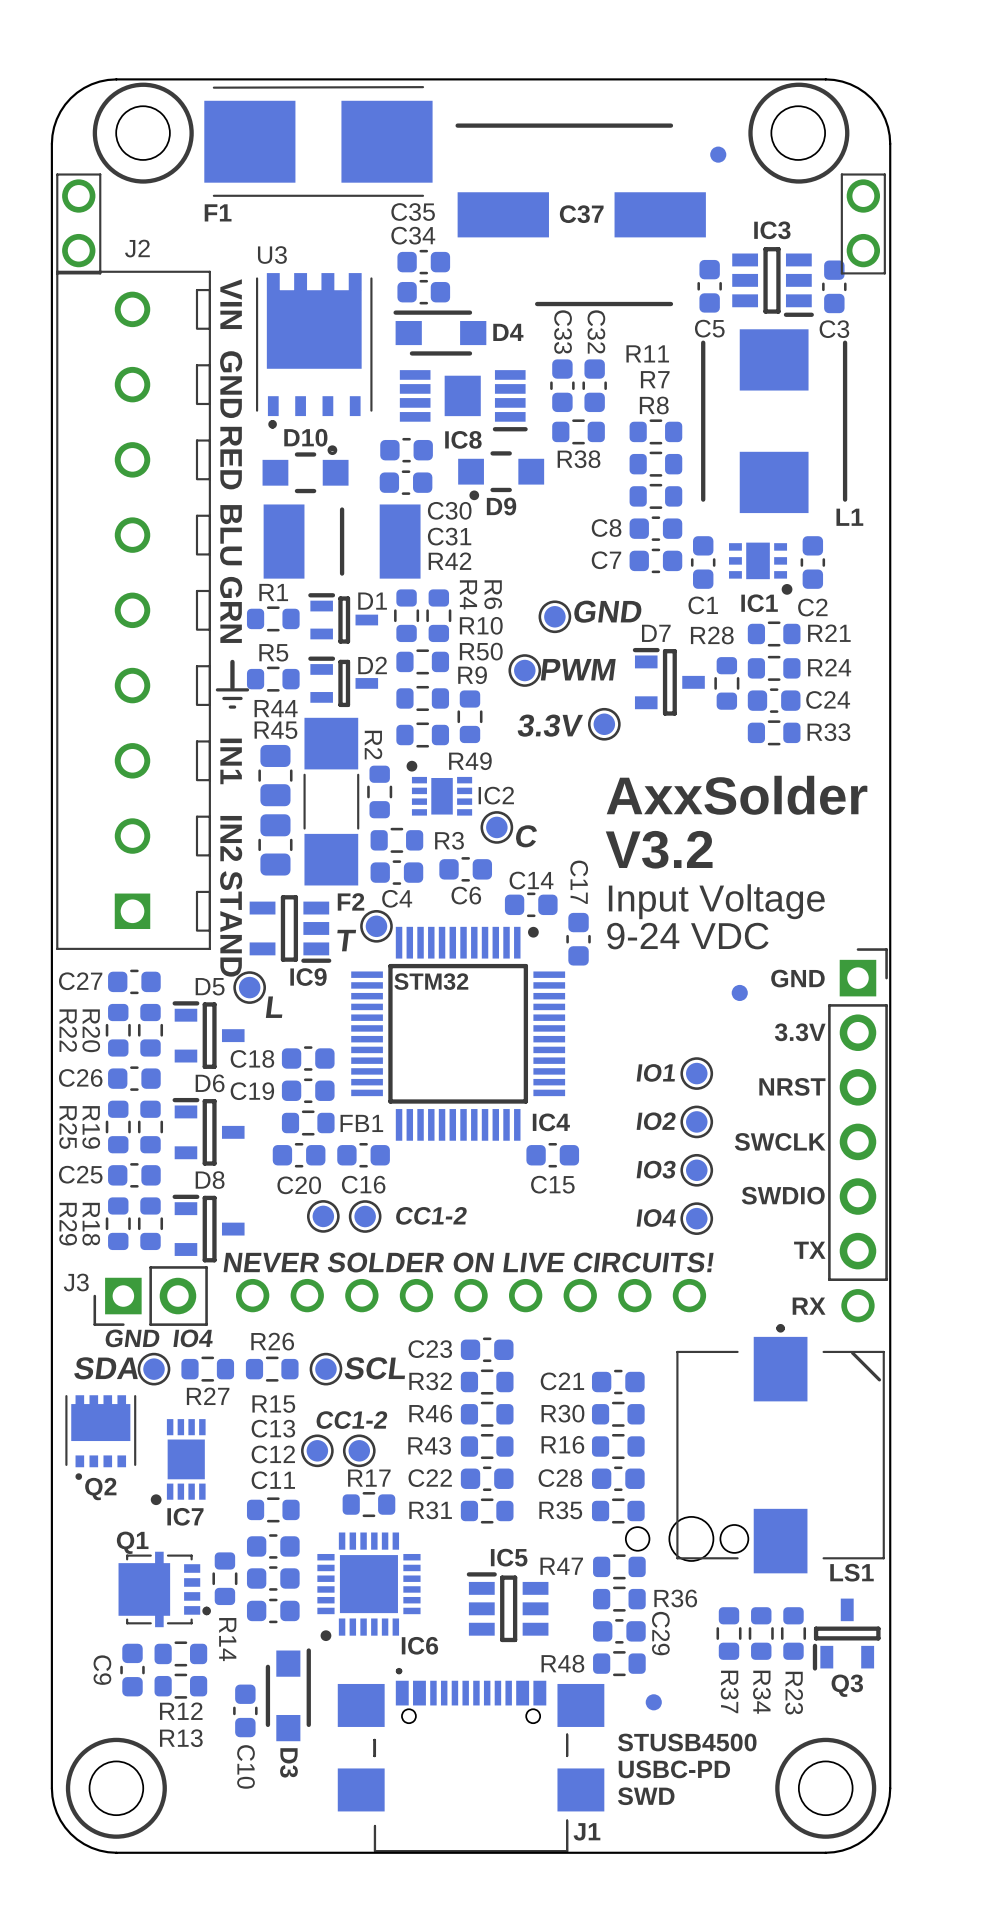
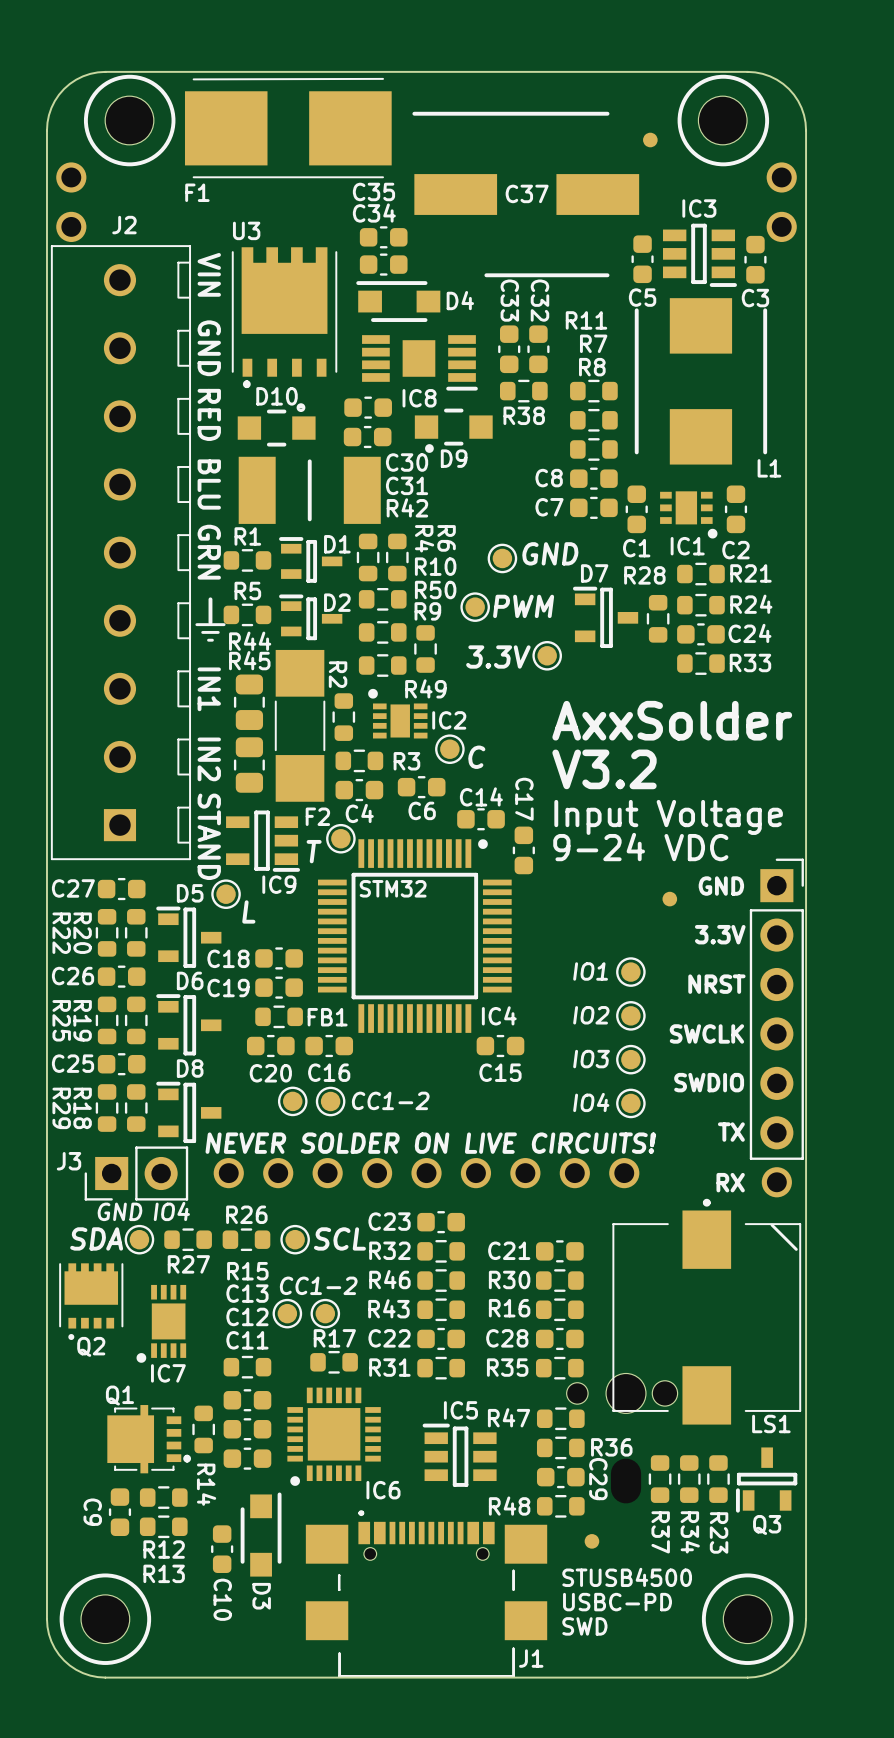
part side: top (78, 223) -> bottom (71, 202)
part side: top (863, 223) -> bottom (781, 202)

